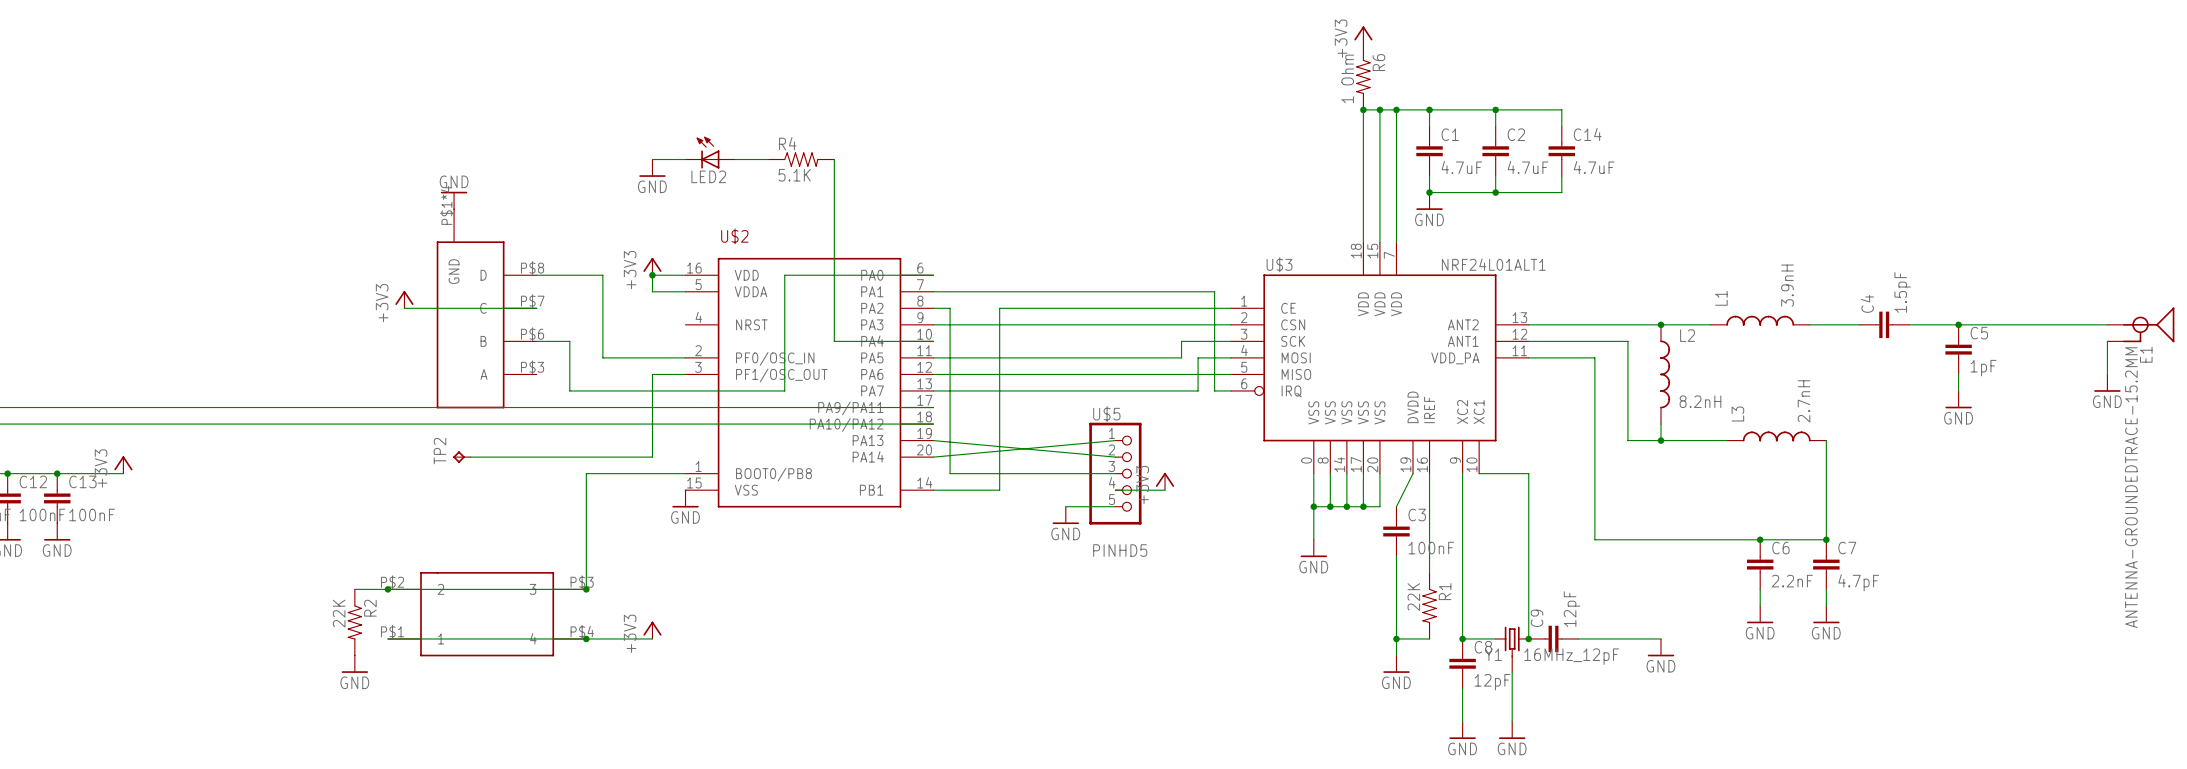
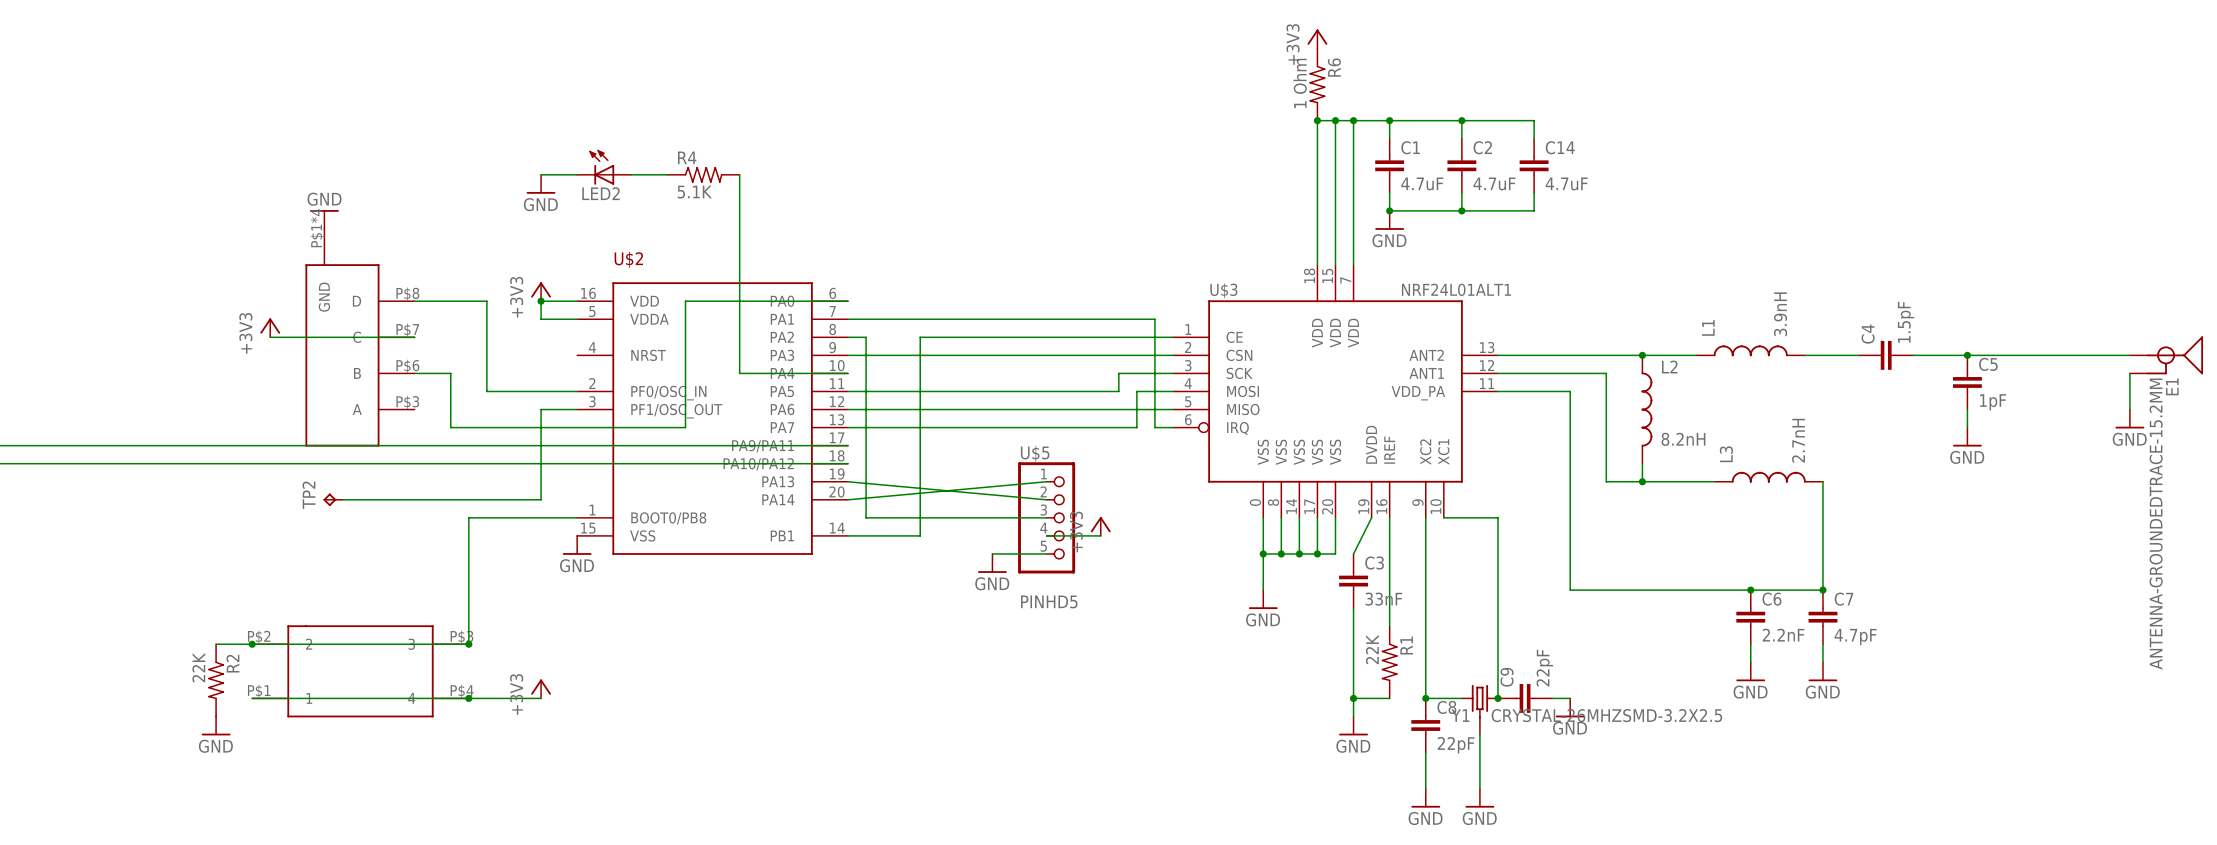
C3 value: 100nF (1431, 548) -> 33nF (1383, 599)
C9 value: 12pF (1572, 609) -> 22pF (1544, 668)
wire: (1594, 638) (1661, 638) -> none
power symbol position: GND (1661, 647) -> GND (1570, 707)
Y1 value: 16MHz_12pF (1571, 656) -> CRYSTAL-26MHZSMD-3.2X2.5 (1606, 715)
C8 value: 12pF (1492, 682) -> 22pF (1456, 745)

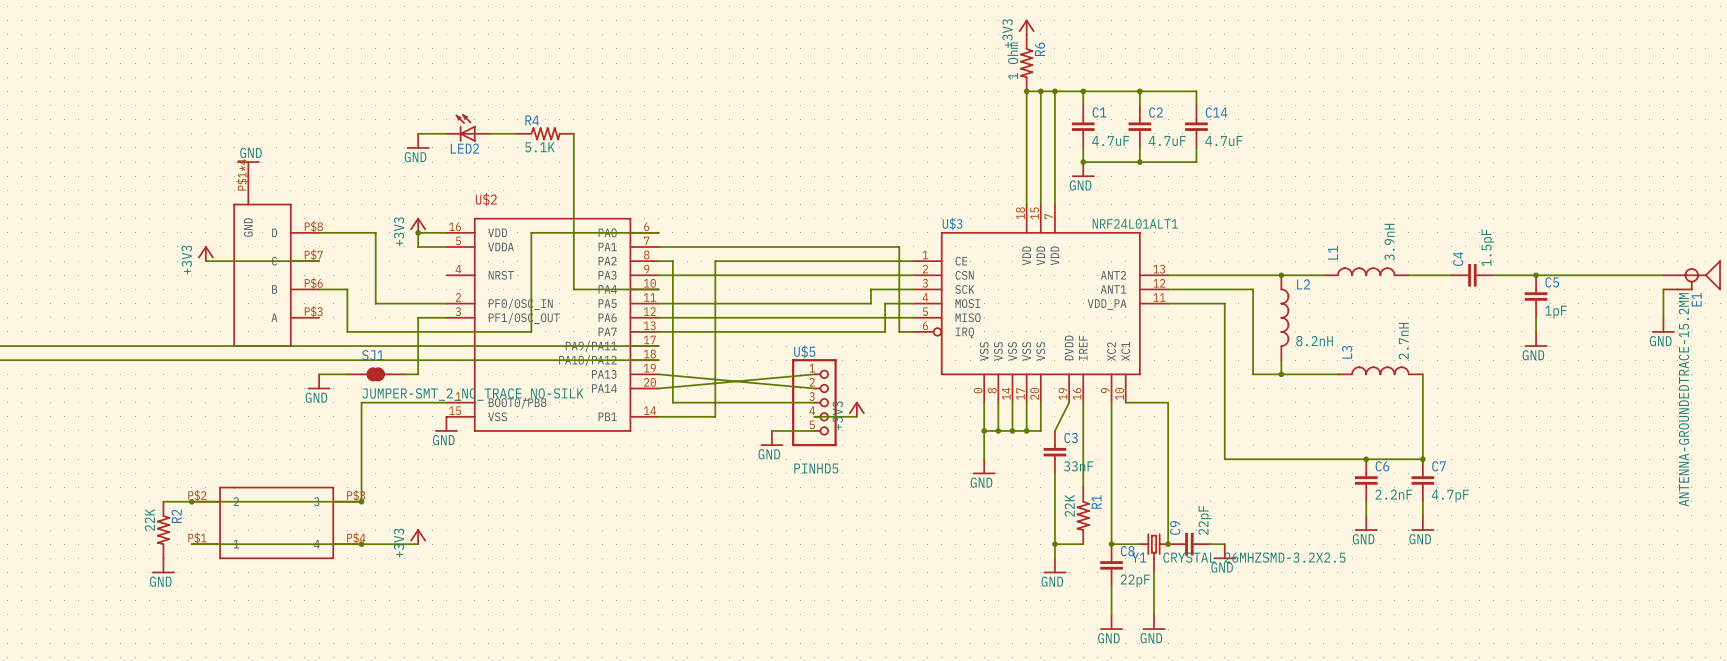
wire: none -> (319, 374) (347, 374)
SJ1: none -> JUMPER-SMT_2_NC_TRACE_NO-SILK (375, 374)
wire: (541, 481) (541, 499) (342, 499) -> (418, 374) (404, 374)
power symbol: none -> GND (319, 381)
TP2: (332, 499) -> none

